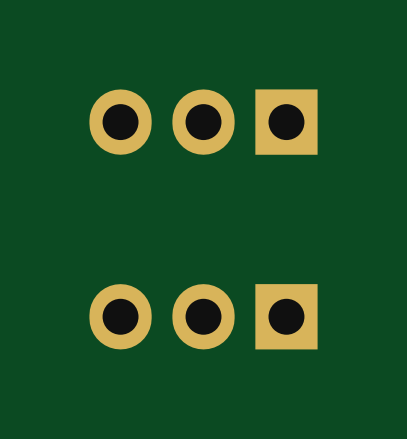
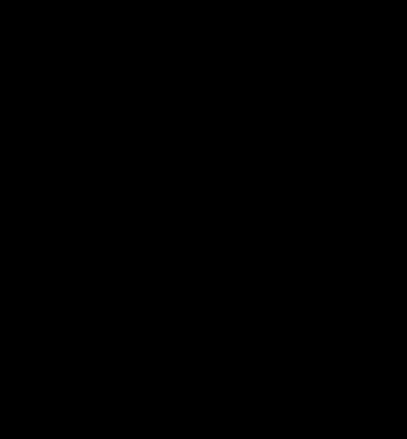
part: (203, 122) -> none
part: (203, 316) -> none

